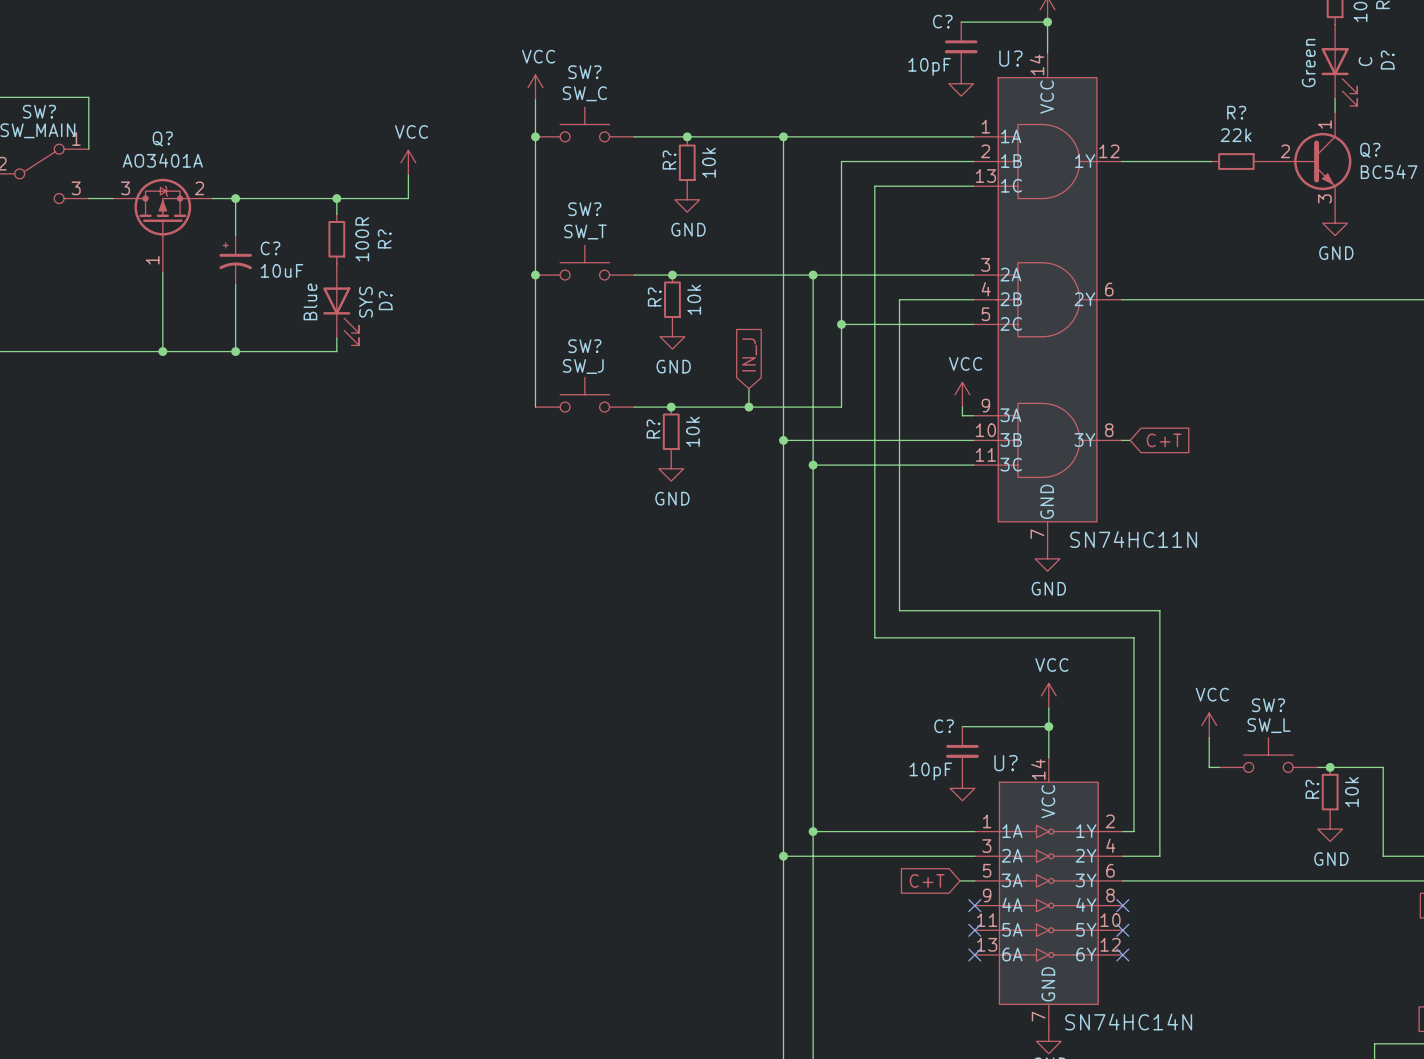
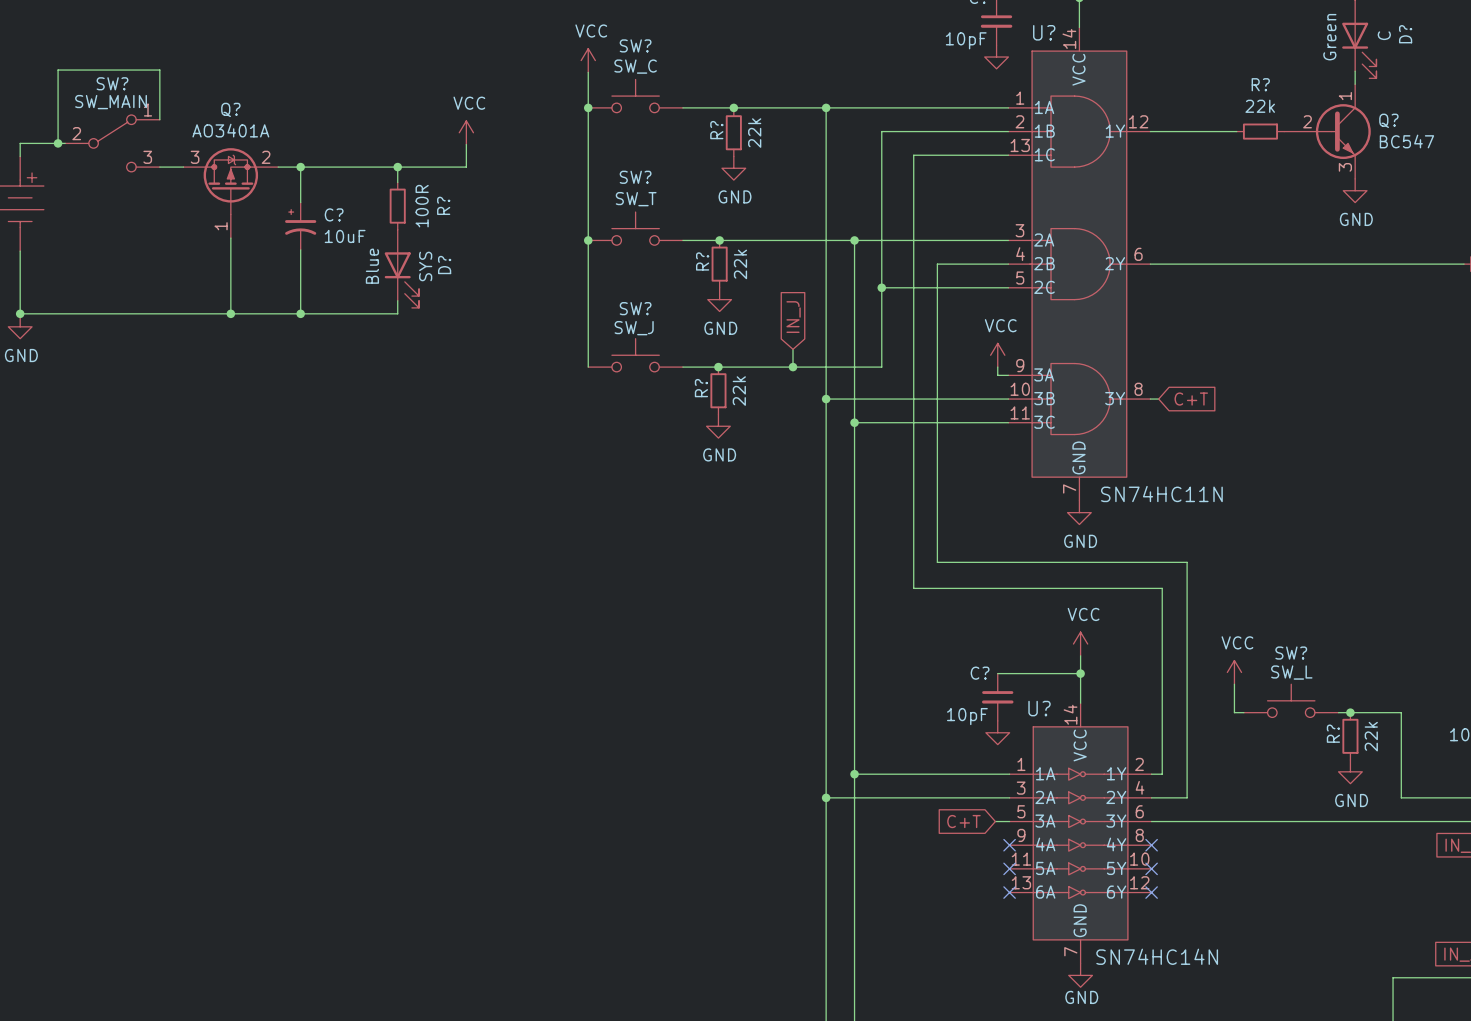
R? value: 10k (709, 162) -> 22k (754, 133)
R? value: 10k (694, 299) -> 22k (740, 264)
R? value: 10k (692, 431) -> 22k (739, 391)
R? value: 10k (1351, 792) -> 22k (1371, 736)

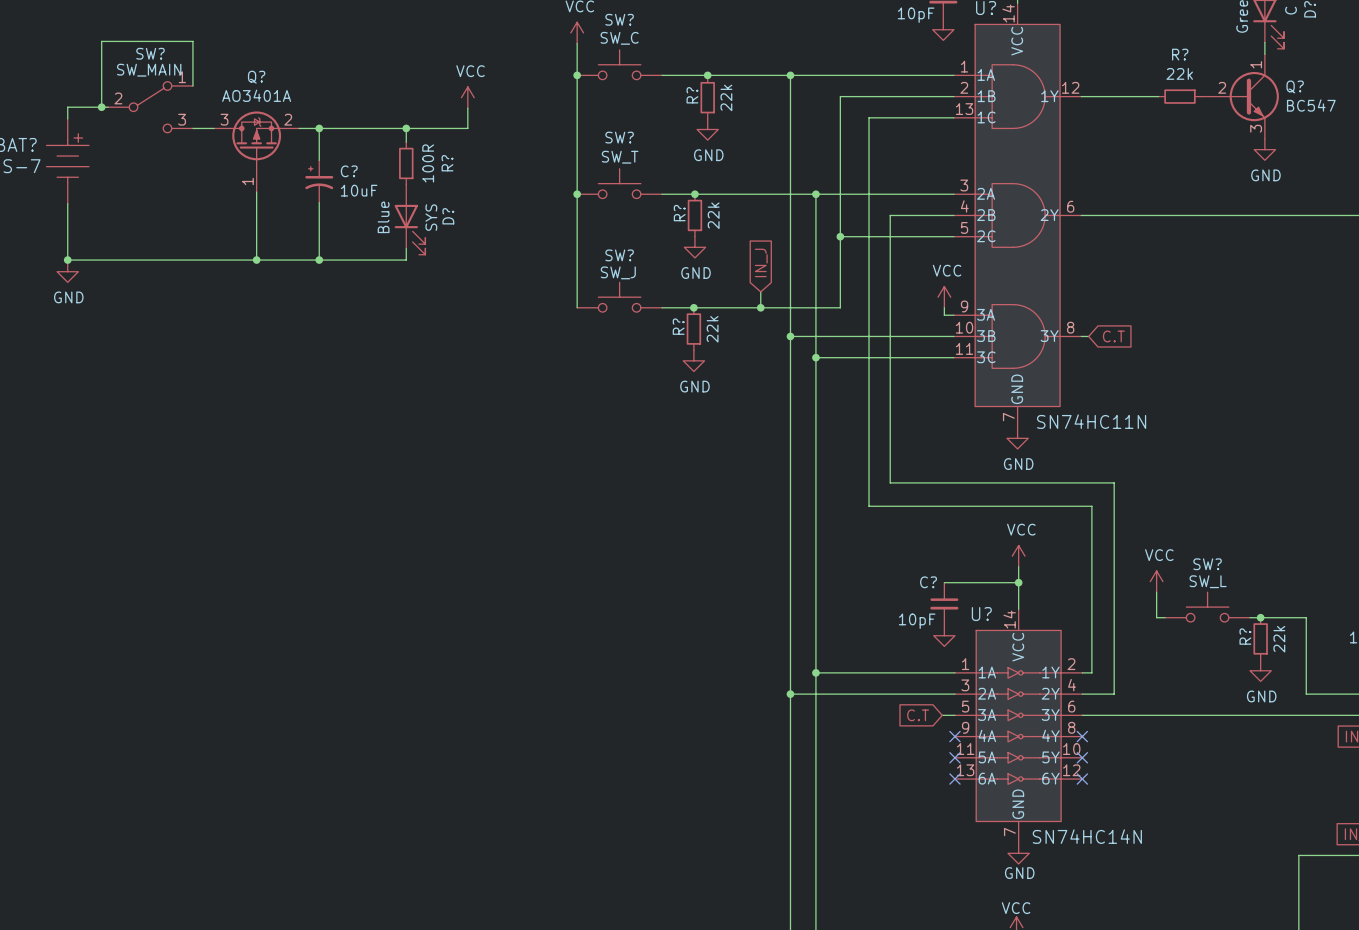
global label: C+T (1191, 399) -> C.T (1113, 336)
global label: C+T (963, 821) -> C.T (918, 715)

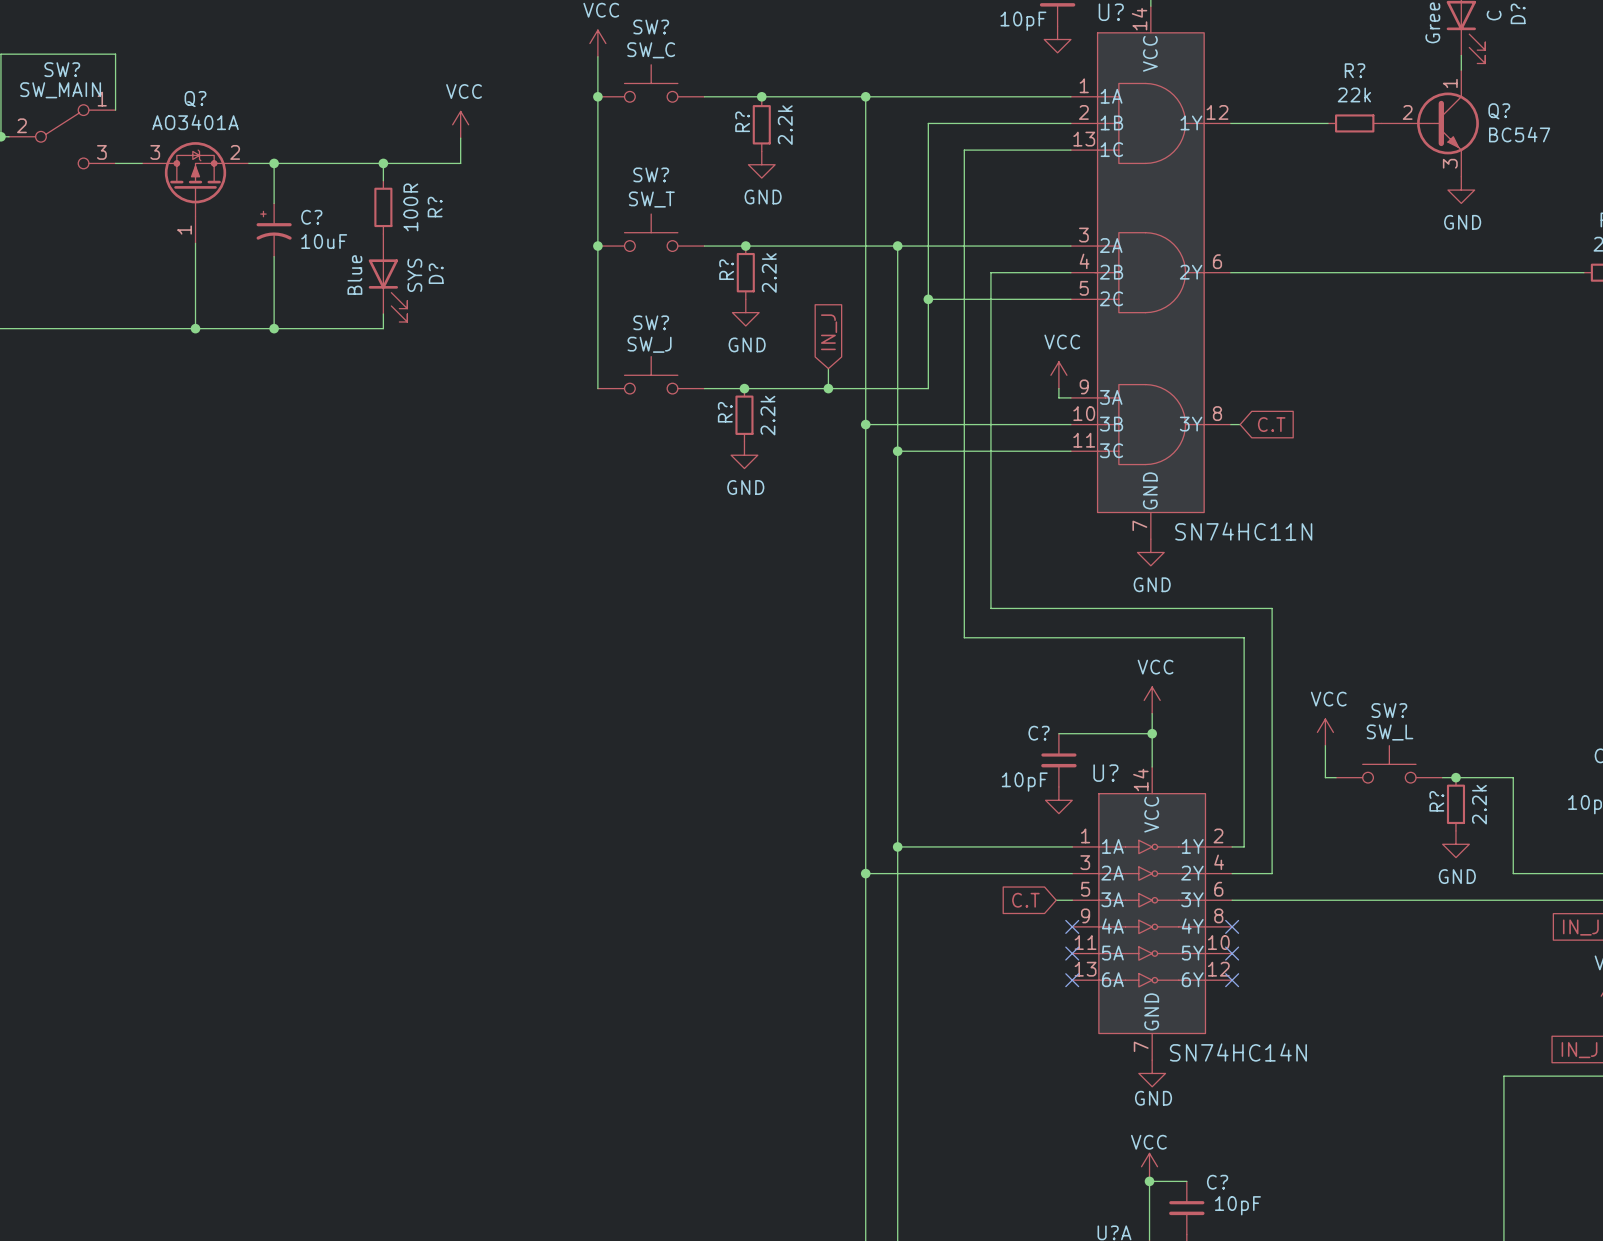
R? value: 22k (726, 97) -> 2.2k (785, 125)
R? value: 22k (713, 215) -> 2.2k (769, 273)
R? value: 22k (712, 329) -> 2.2k (767, 415)
R? value: 22k (1279, 639) -> 2.2k (1479, 804)

